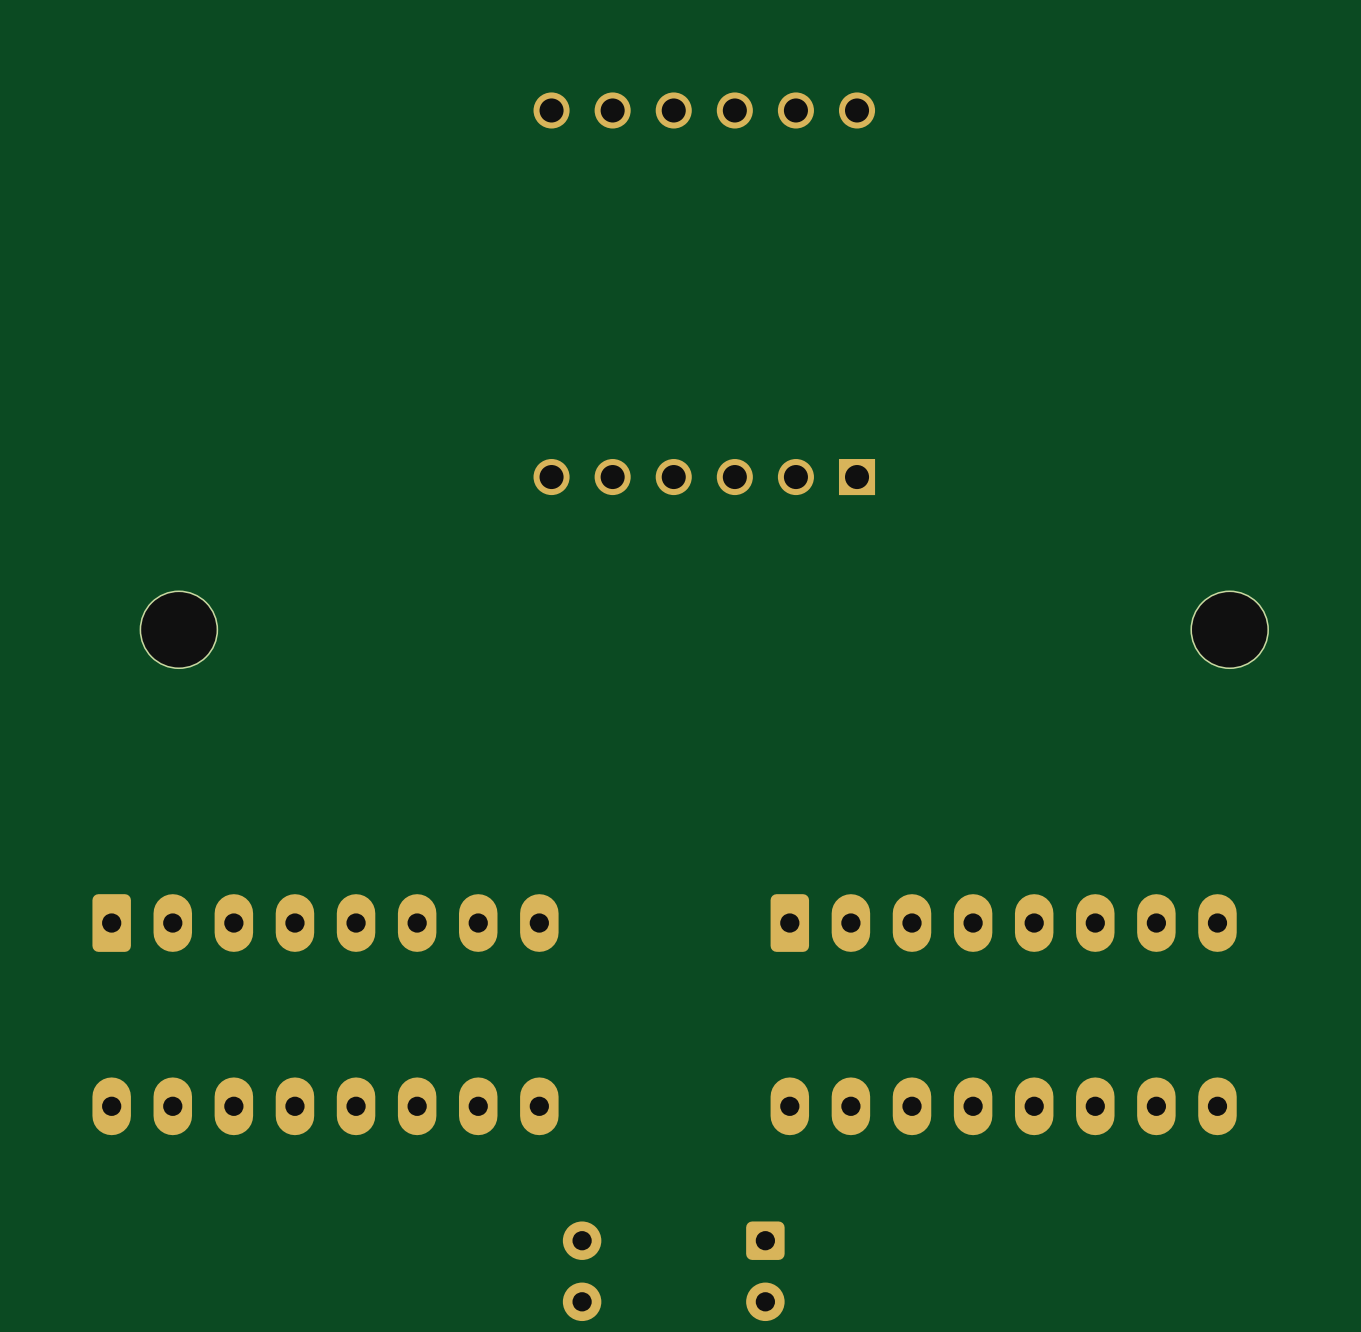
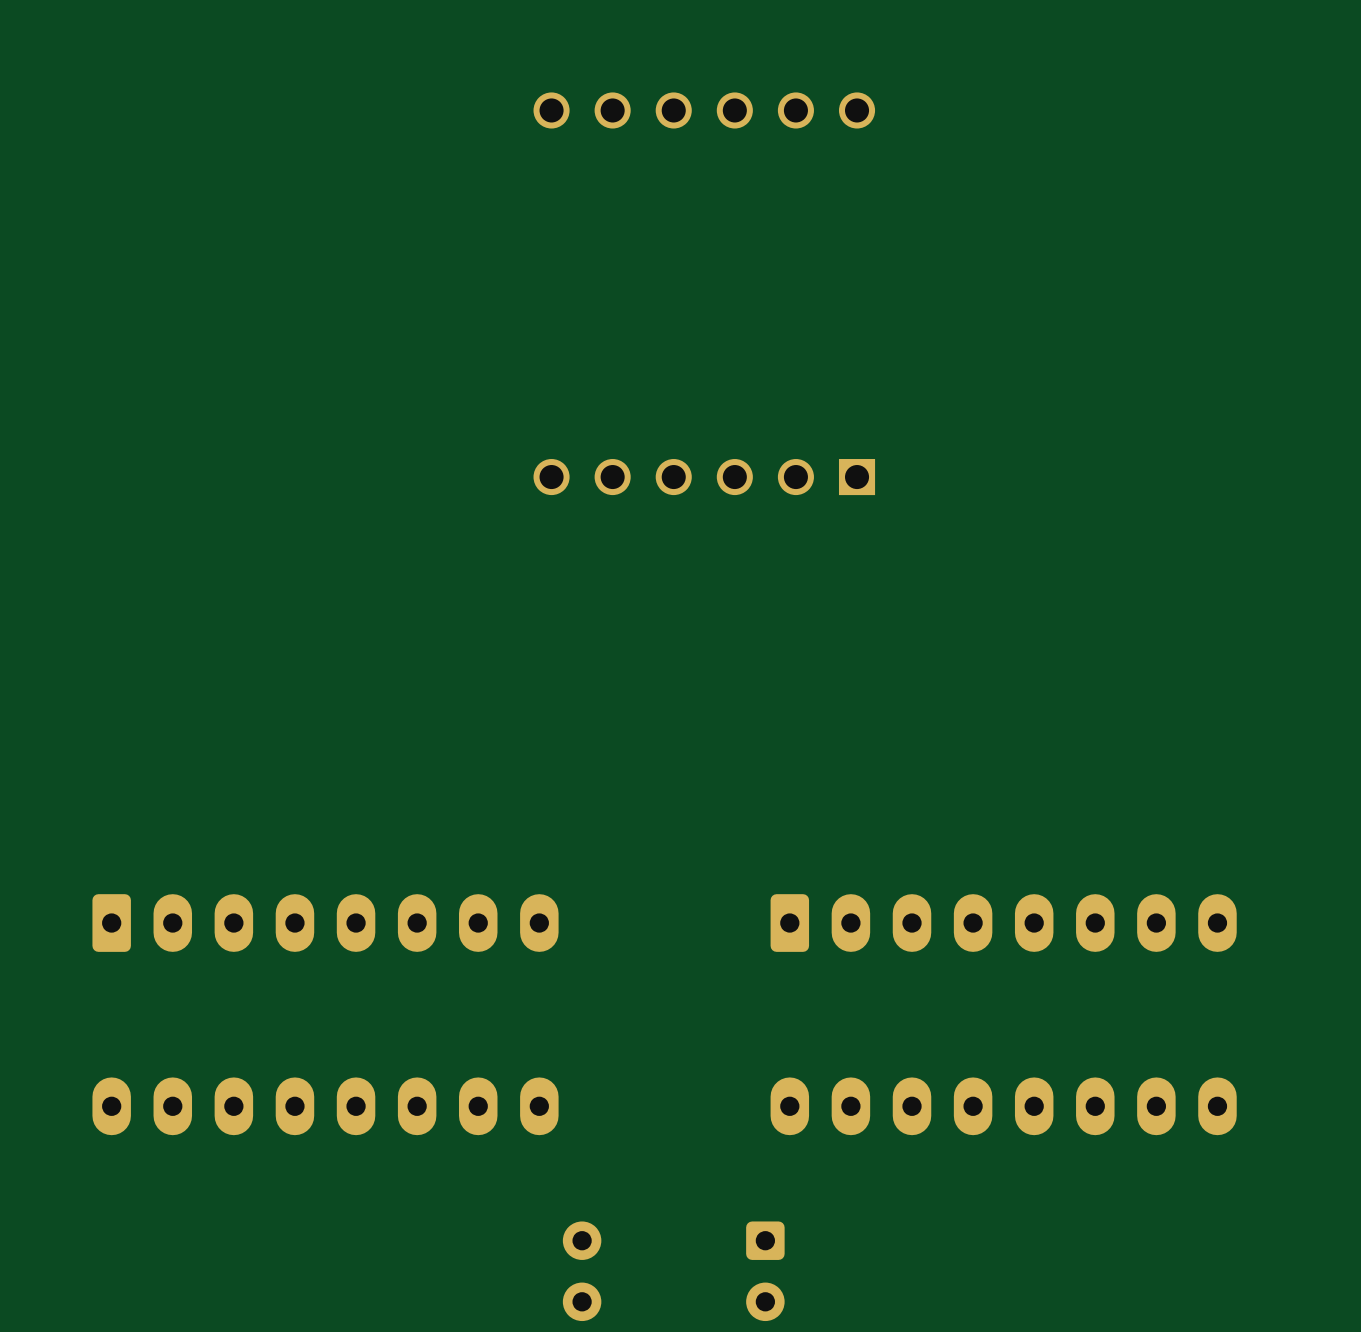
part: (178, 629) -> none
part: (1229, 629) -> none

